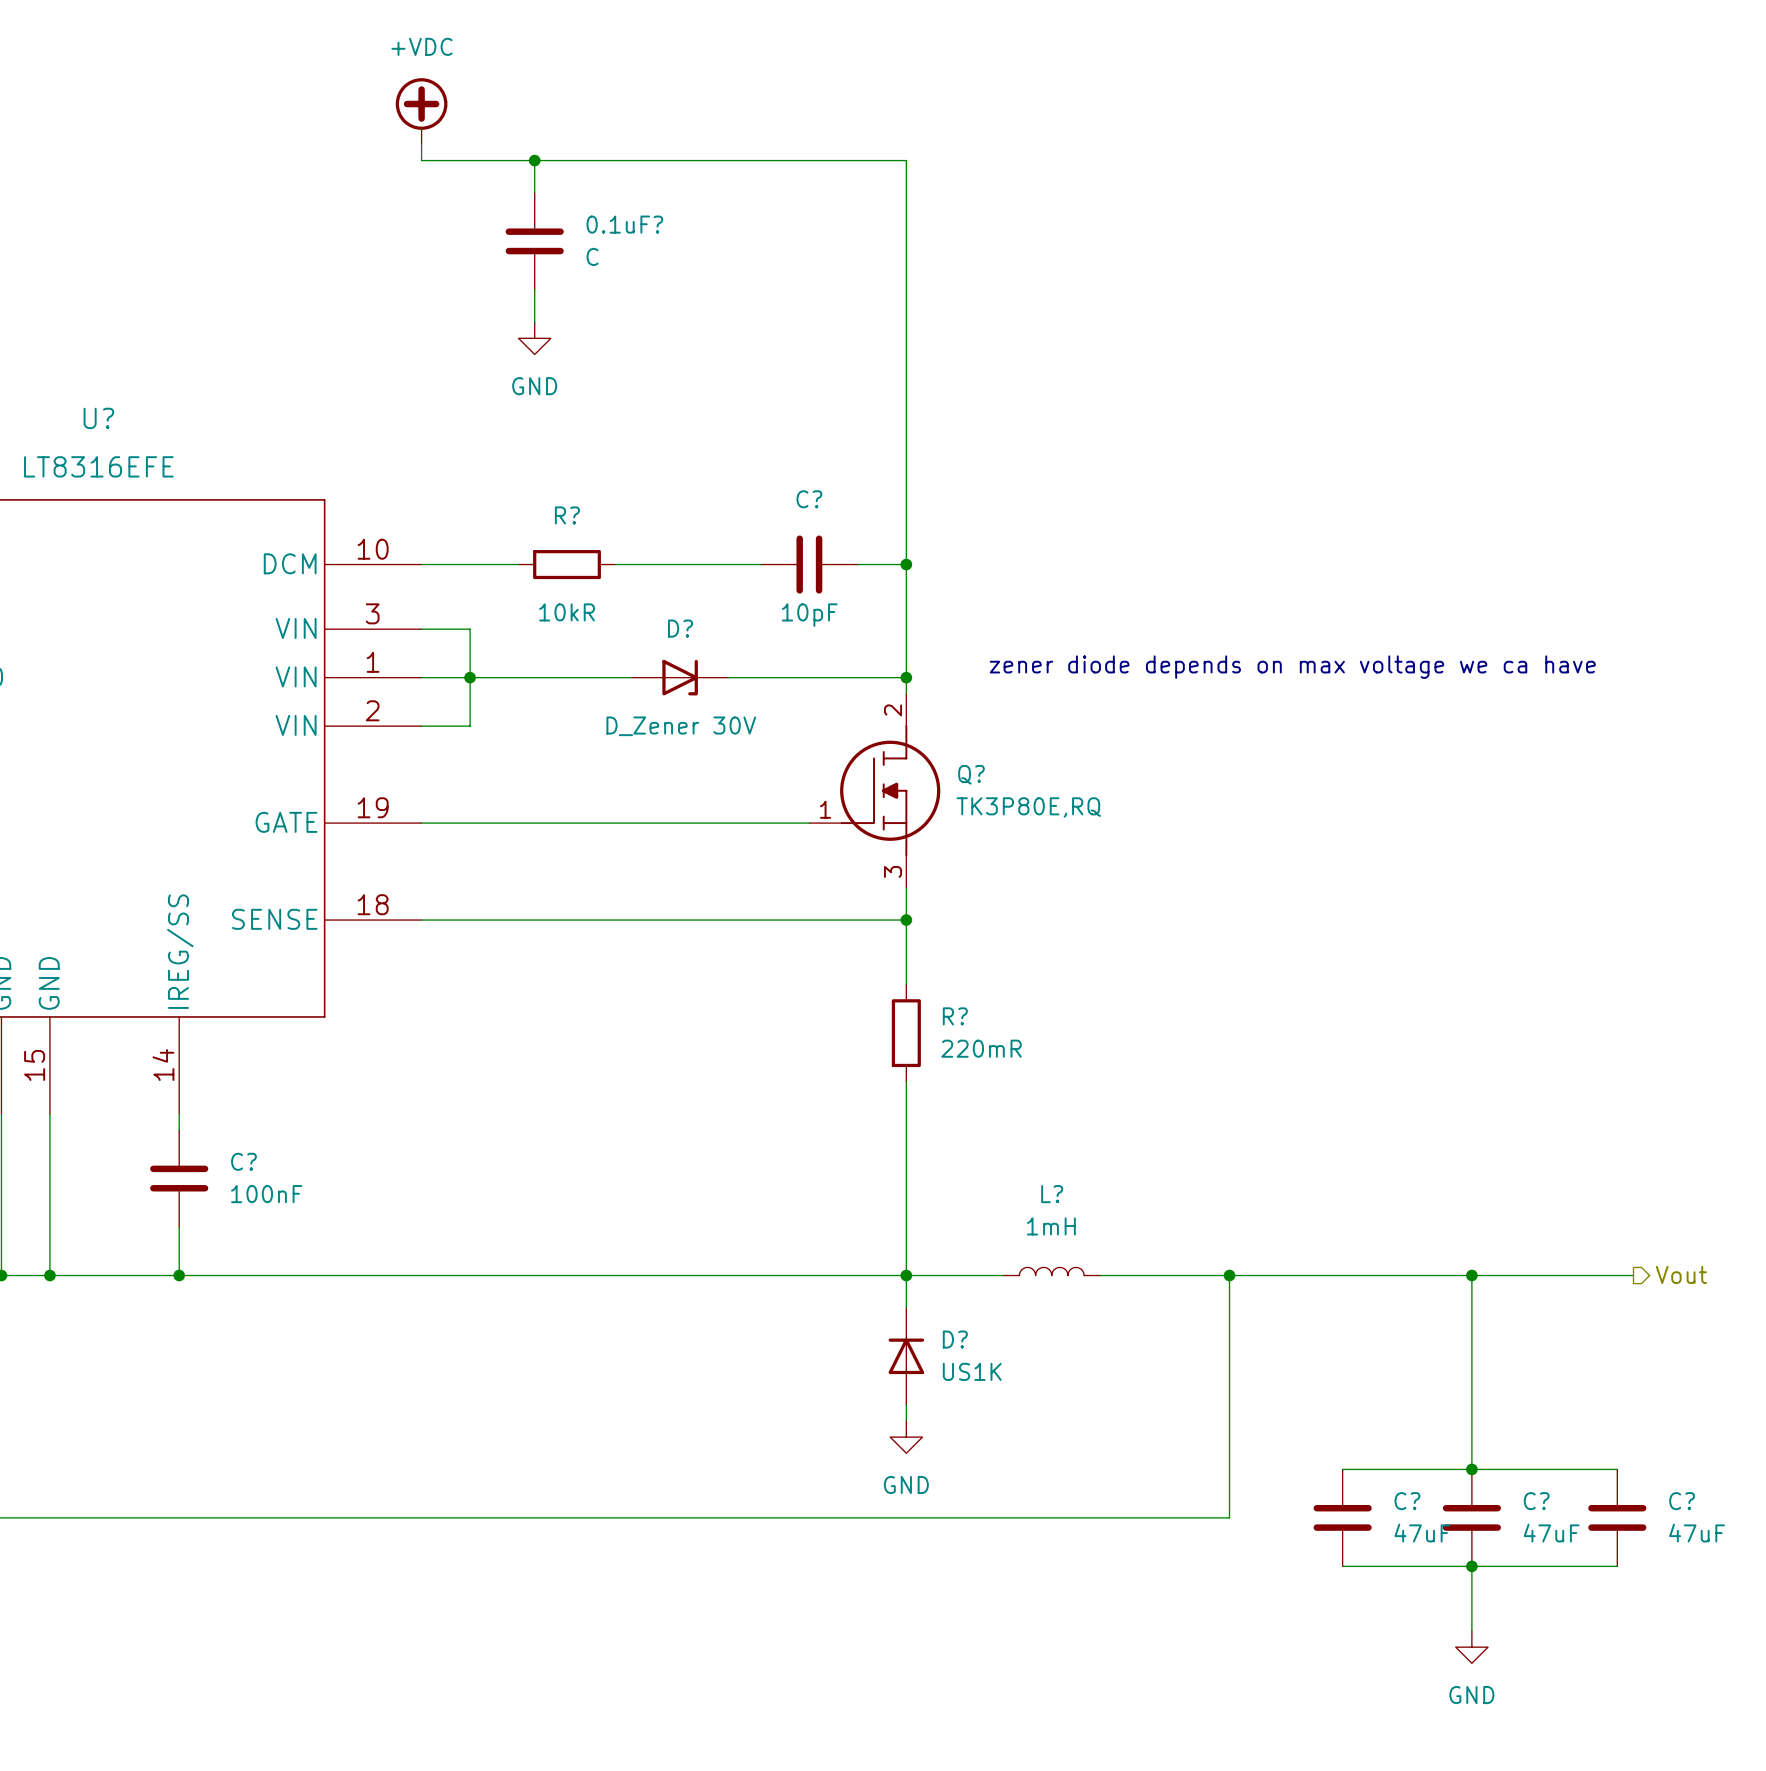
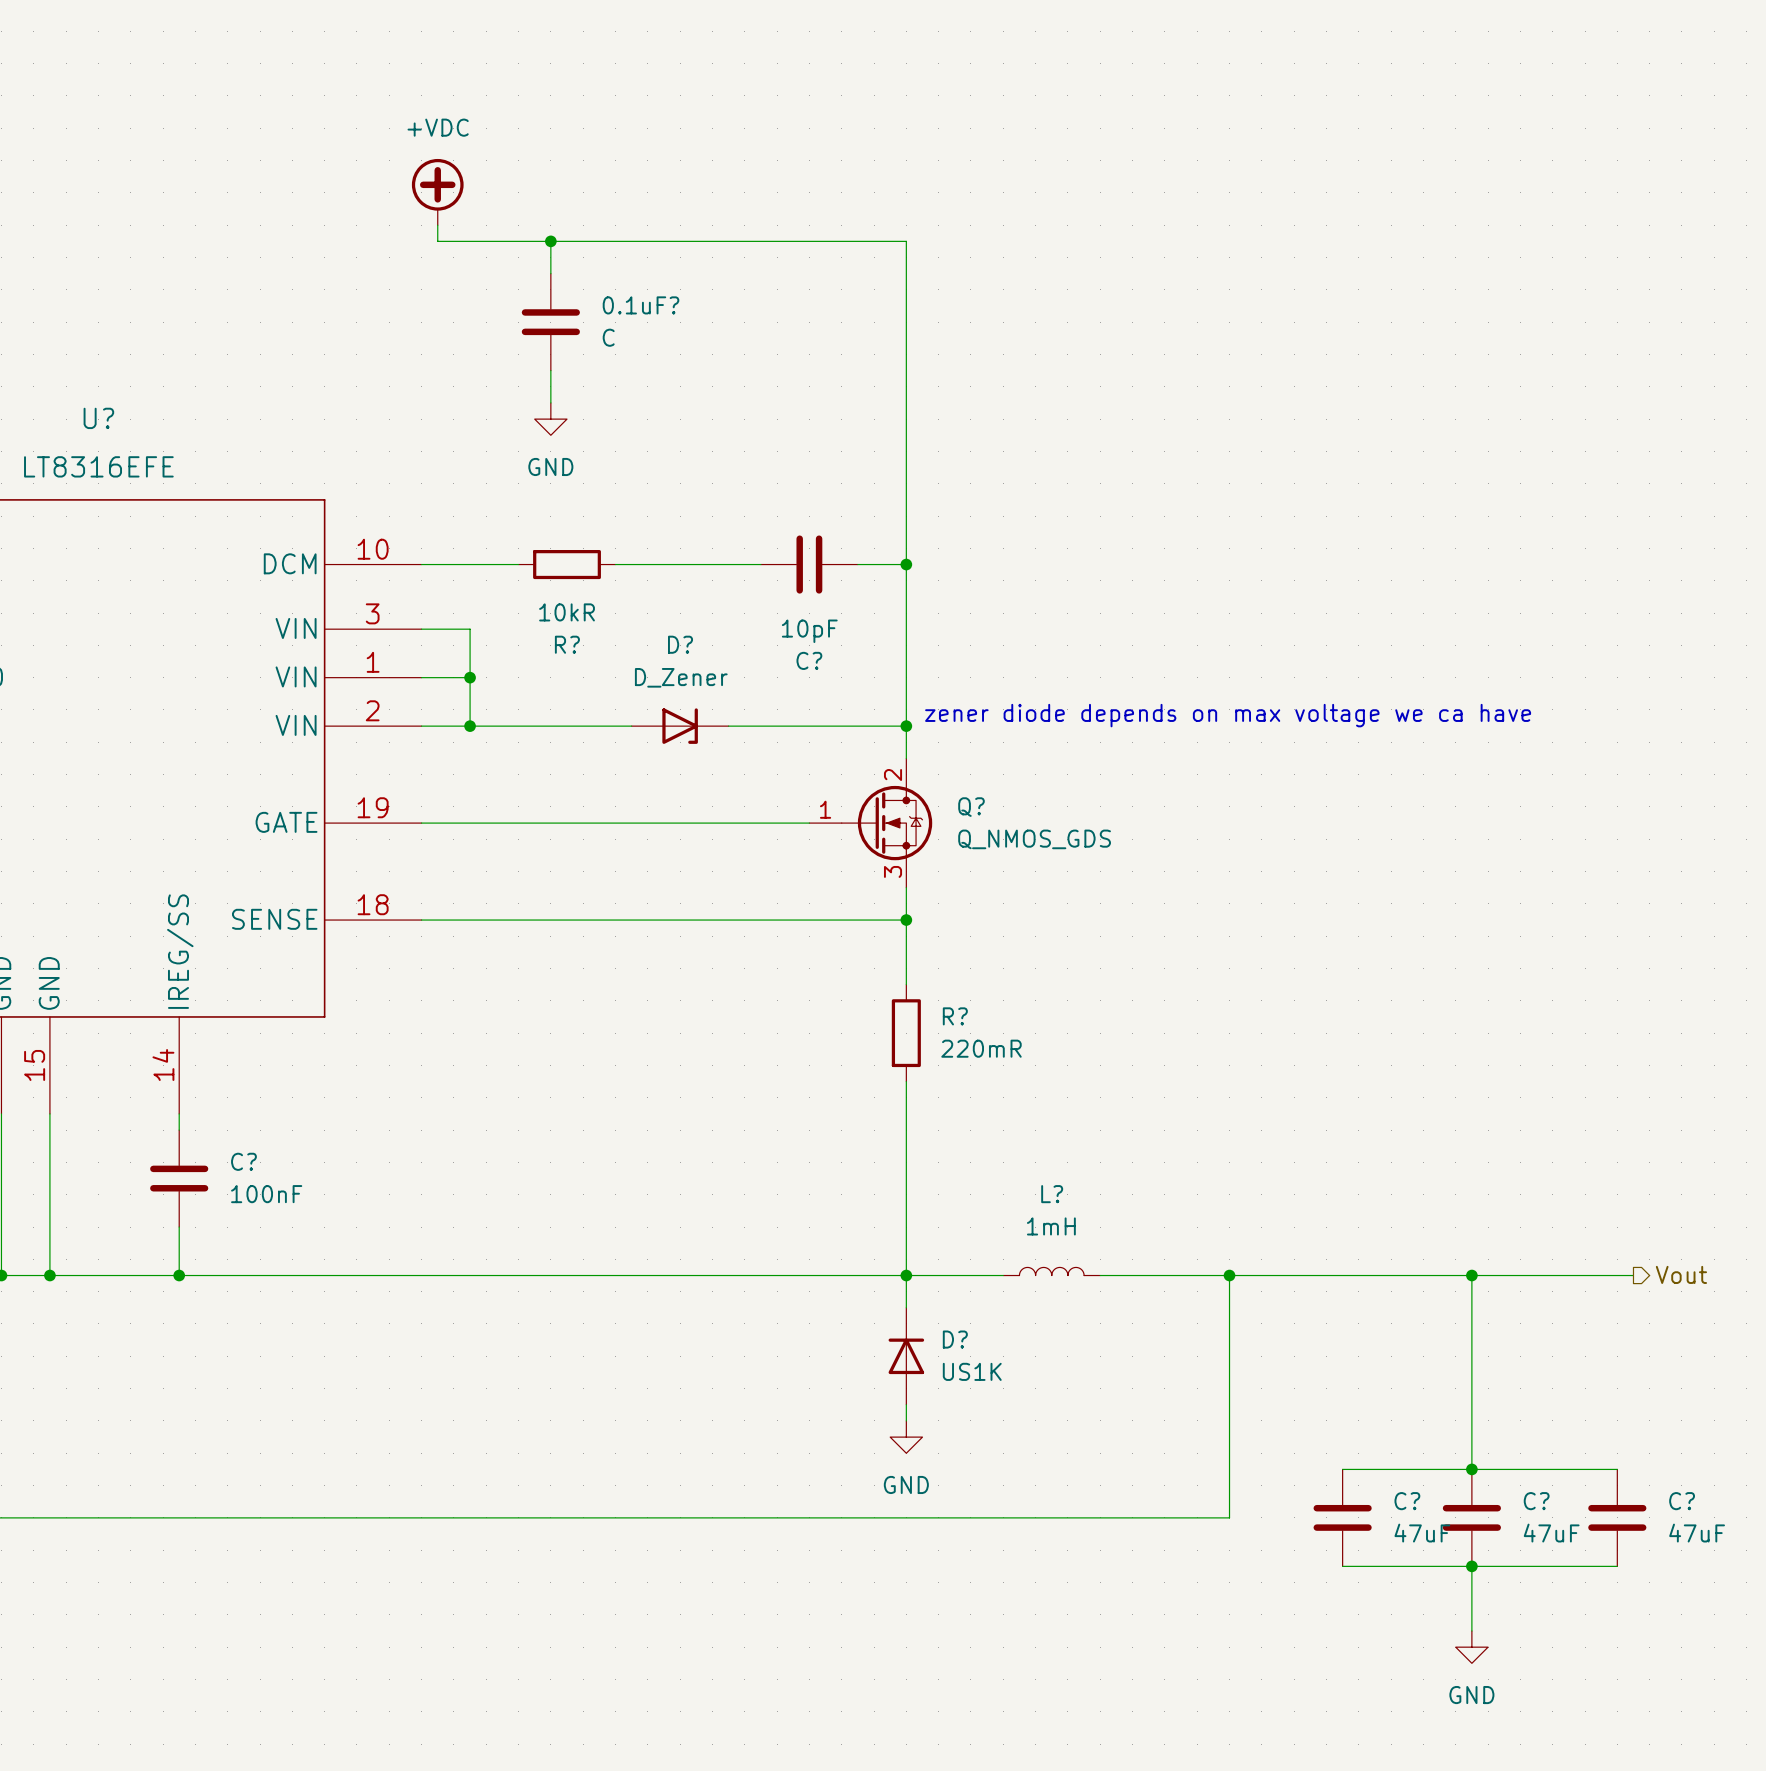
power symbol position: +VDC (421, 111) -> +VDC (437, 192)
wire: (421, 144) (421, 160) (906, 160) (906, 241) -> (437, 225) (437, 241) (906, 241)
wire: (534, 160) (534, 192) -> (550, 241) (550, 273)
junction: (534, 160) -> none
0.1uF? position: (534, 241) -> (550, 322)
junction: none -> (550, 241)
wire: (534, 289) (534, 322) -> (550, 370) (550, 402)
power symbol position: GND (534, 338) -> GND (550, 419)
C? name position: C? (809, 499) -> C? (809, 660)
R? name position: R? (567, 515) -> R? (567, 644)
C? value position: 10pF (809, 615) -> 10pF (809, 631)
text position: zener diode depends on max voltage we ca have (1292, 667) -> zener diode depends on max voltage we ca have (1228, 715)
wire: (470, 677) (631, 677) -> (470, 726) (631, 726)
D?: D_Zener 30V (680, 677) -> none
wire: (728, 677) (906, 677) -> (728, 726) (906, 726)
junction position: (906, 677) -> (906, 726)
junction: none -> (470, 726)
D?: none -> D_Zener (680, 726)
Q?: TK3P80E,RQ (874, 790) -> none
Q?: none -> Q_NMOS_GDS (870, 823)

